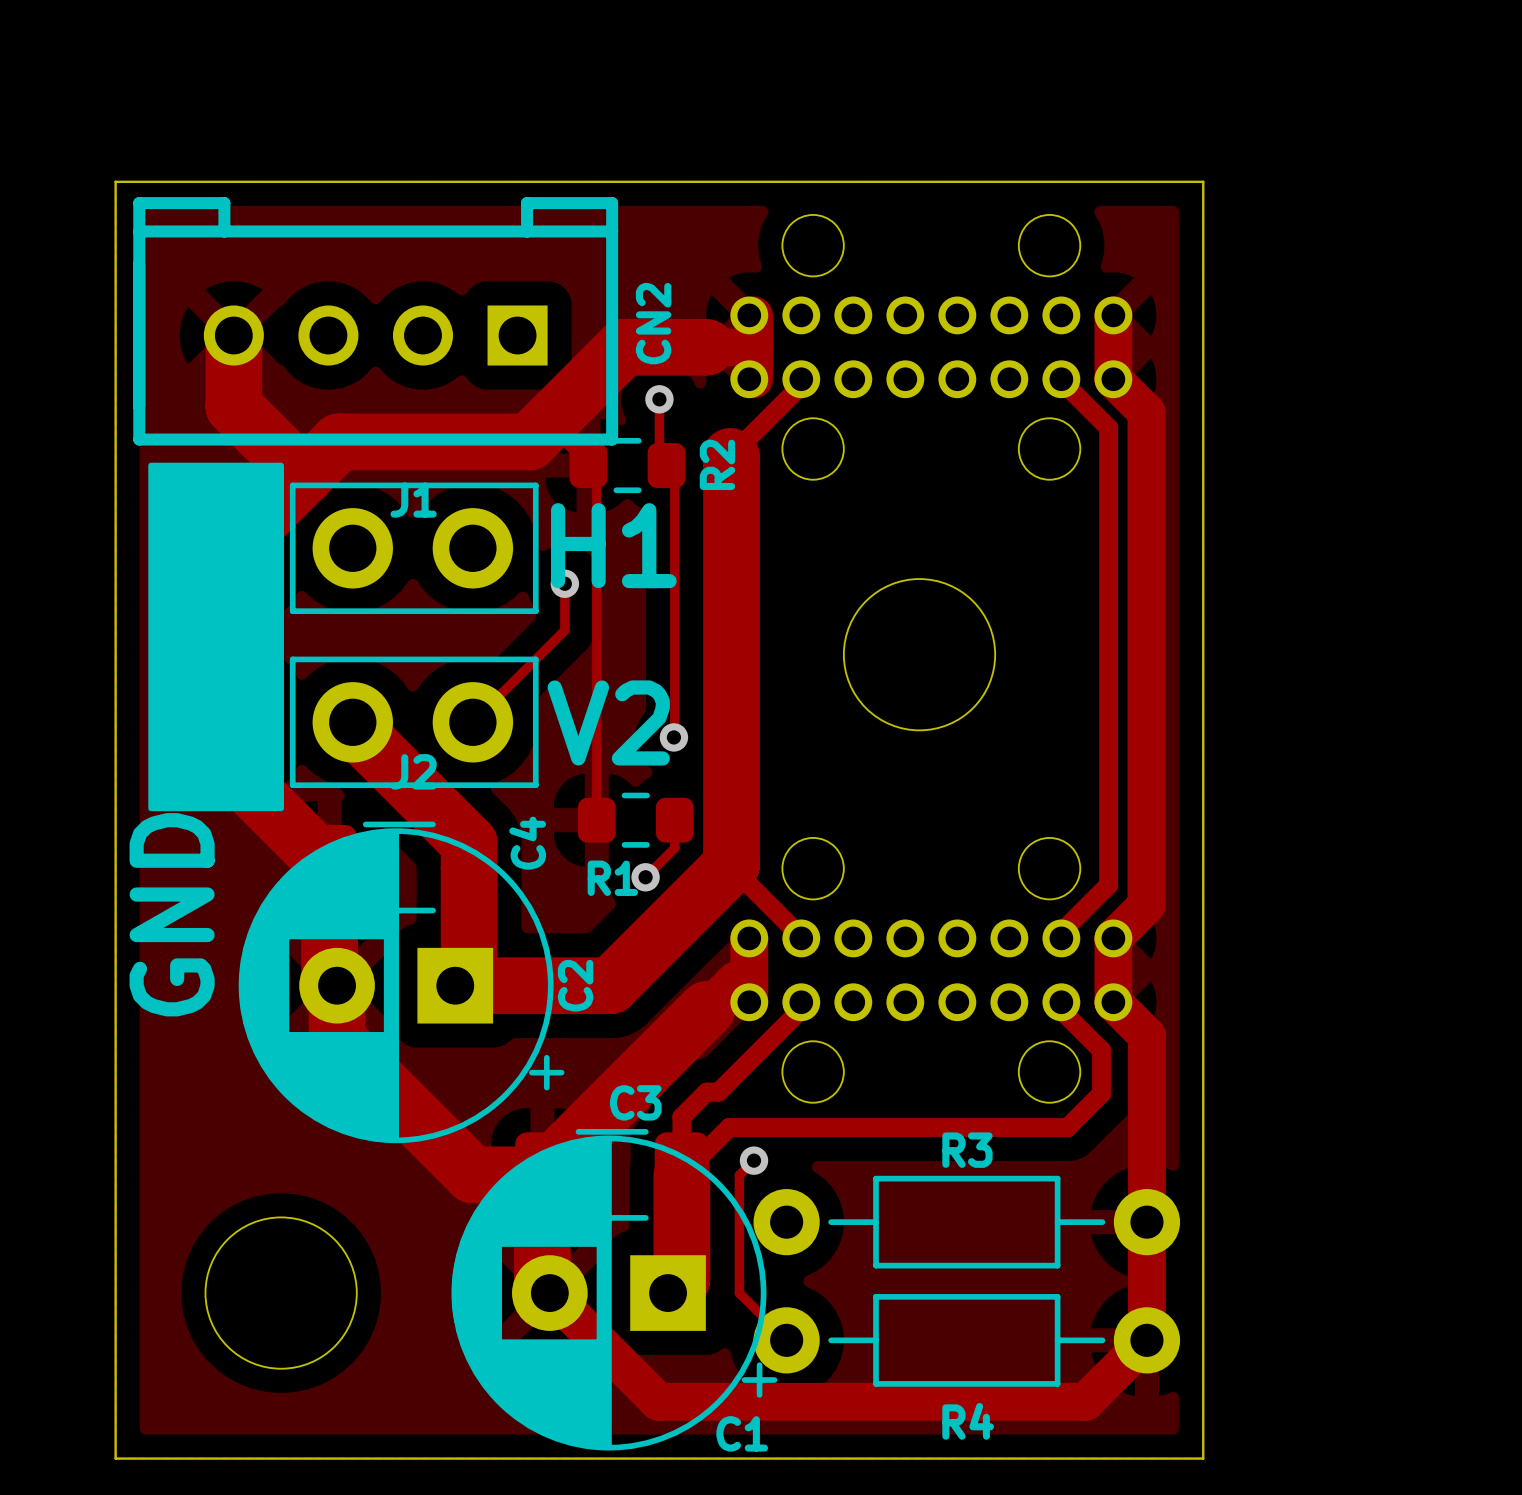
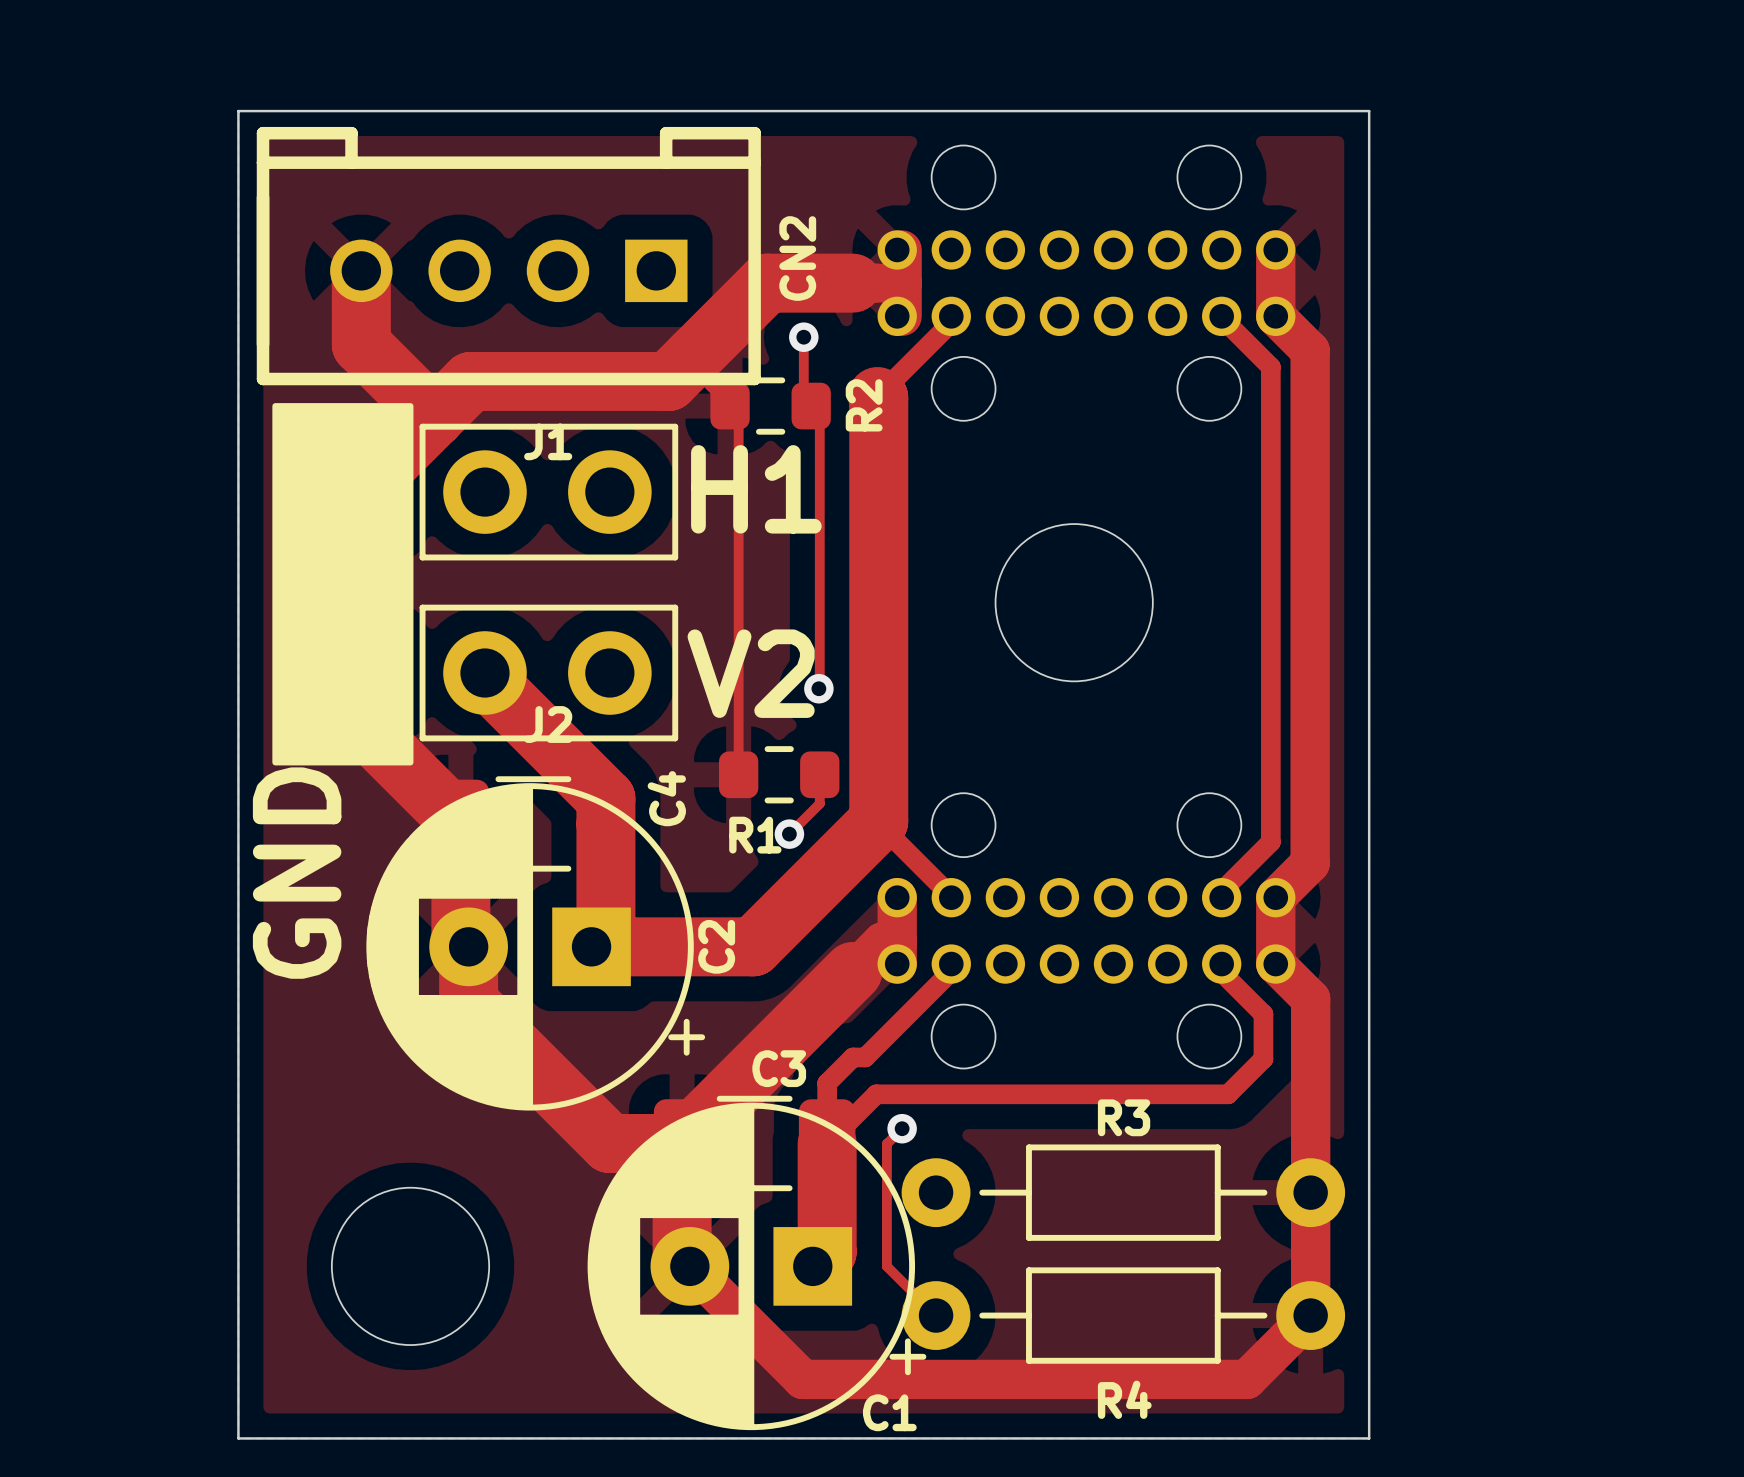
track: (564, 583) (564, 630) (472, 722) -> none
via: (564, 583) -> none

